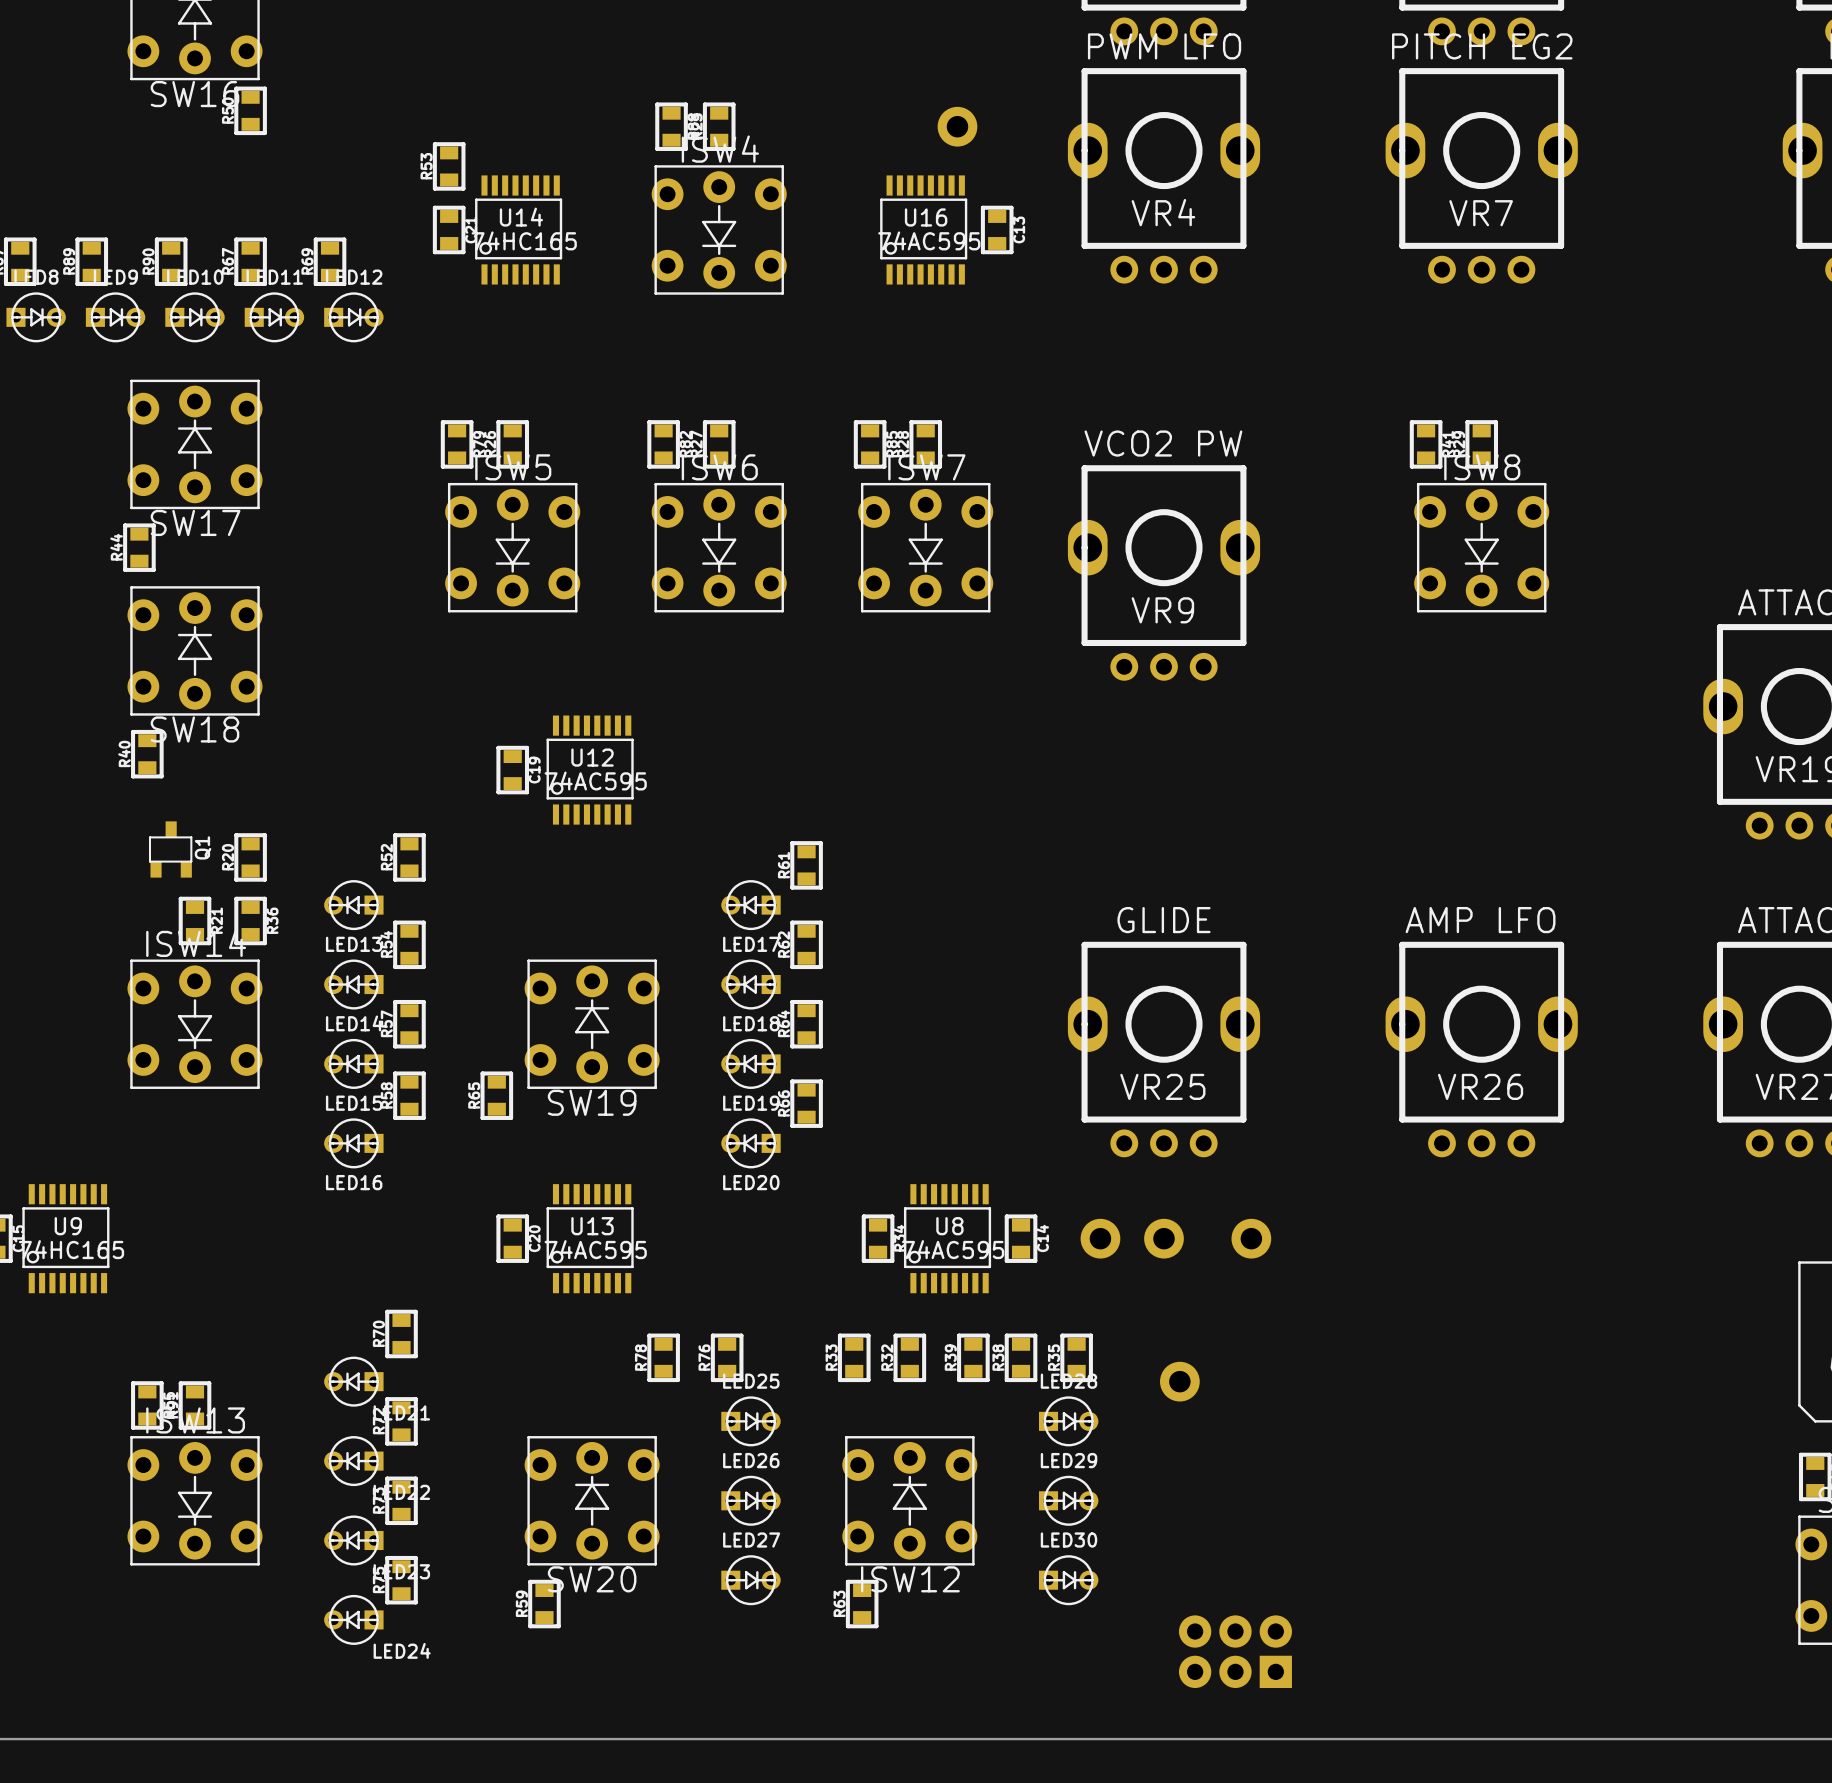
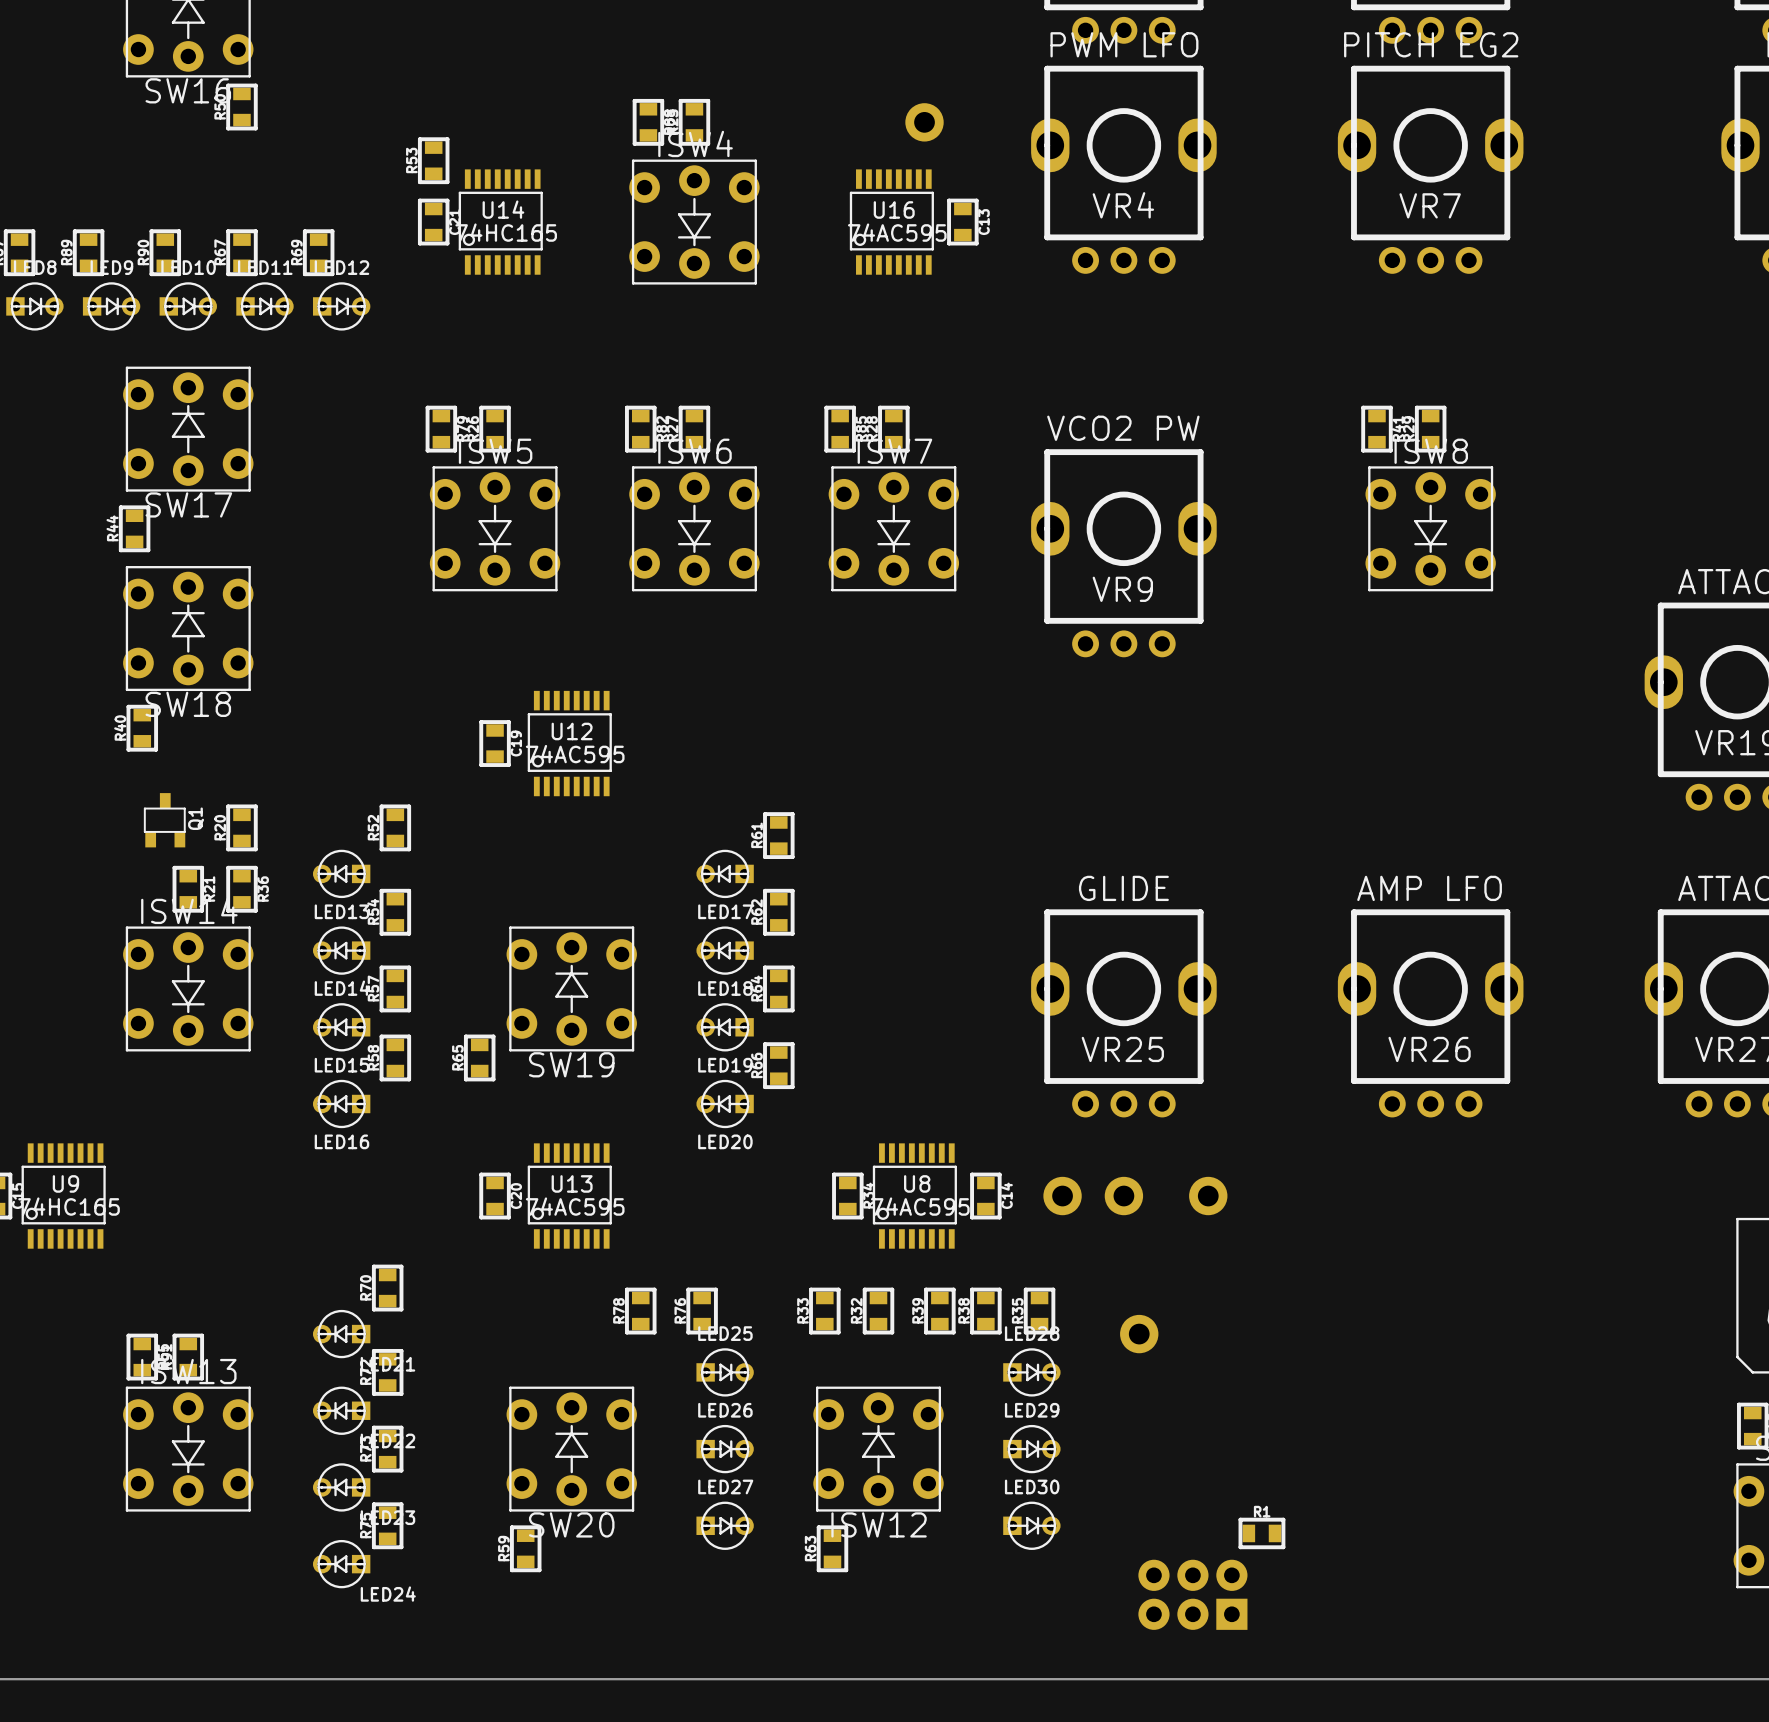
R1: none -> (1261, 1533)

